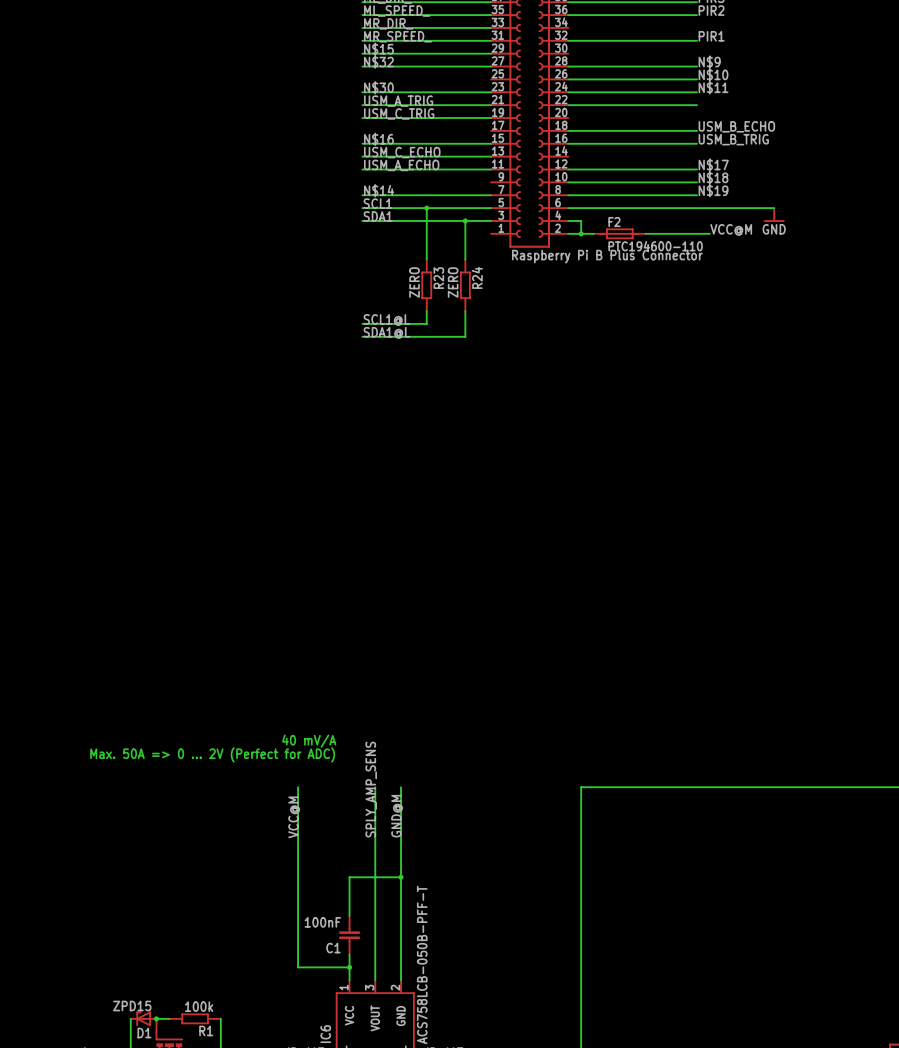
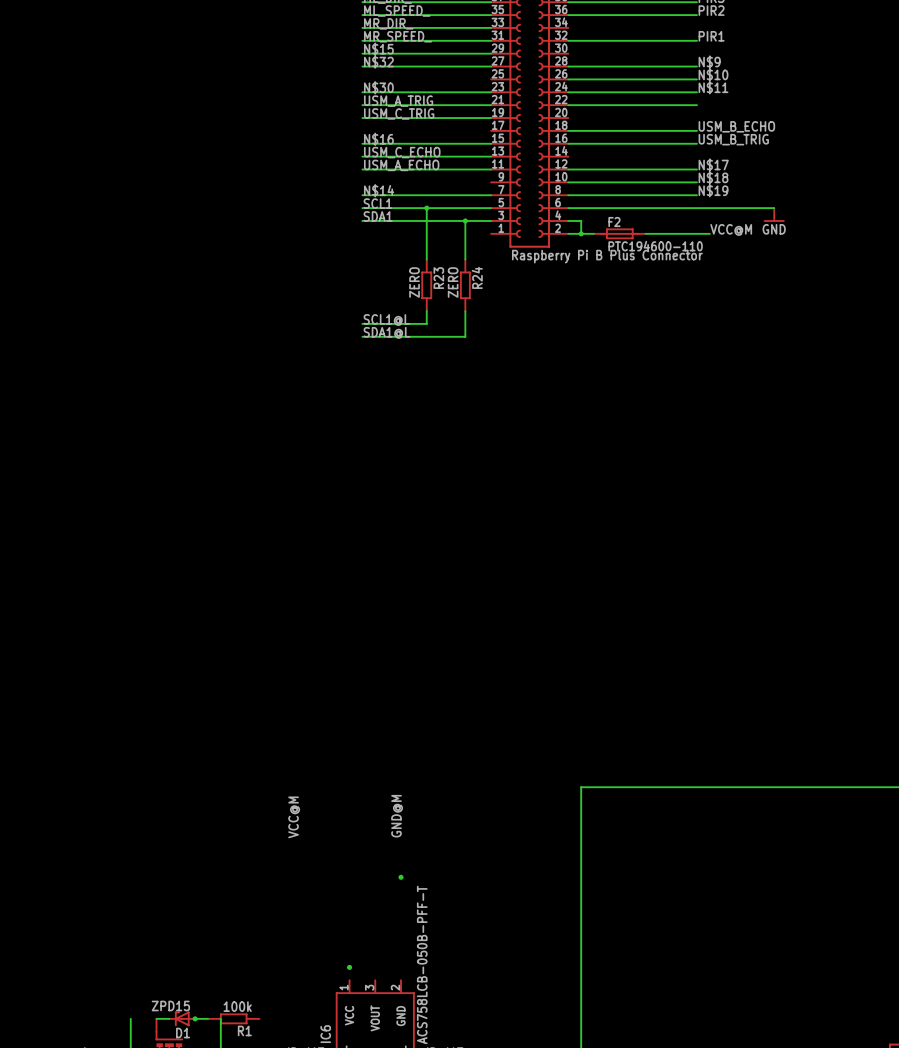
text: 40 mV/A (309, 741) -> none
text: Max. 50A => 0 ... 2V (Perfect for ADC) (212, 754) -> none
wire: (298, 787) (298, 967) (349, 967) -> none
wire: (375, 787) (375, 980) -> none
wire: (401, 787) (401, 980) -> none
label: SPLY_AMP_SENS (371, 789) -> none
wire: (401, 877) (349, 877) (349, 915) -> none
C1: 100nF (349, 935) -> none
wire: (349, 954) (349, 980) -> none
D1 position: (143, 1018) -> (182, 1018)
junction: (156, 1018) -> none
wire: none -> (195, 1018) (207, 1018)
R1 position: (195, 1018) -> (233, 1018)
junction: none -> (195, 1018)

